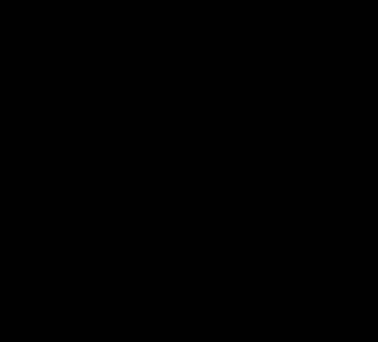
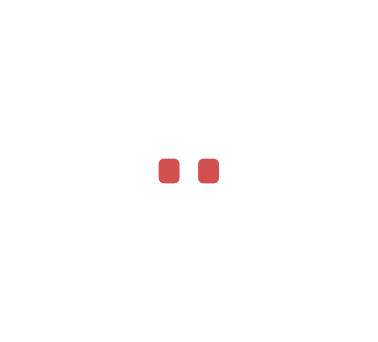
part: none -> (188, 171)

